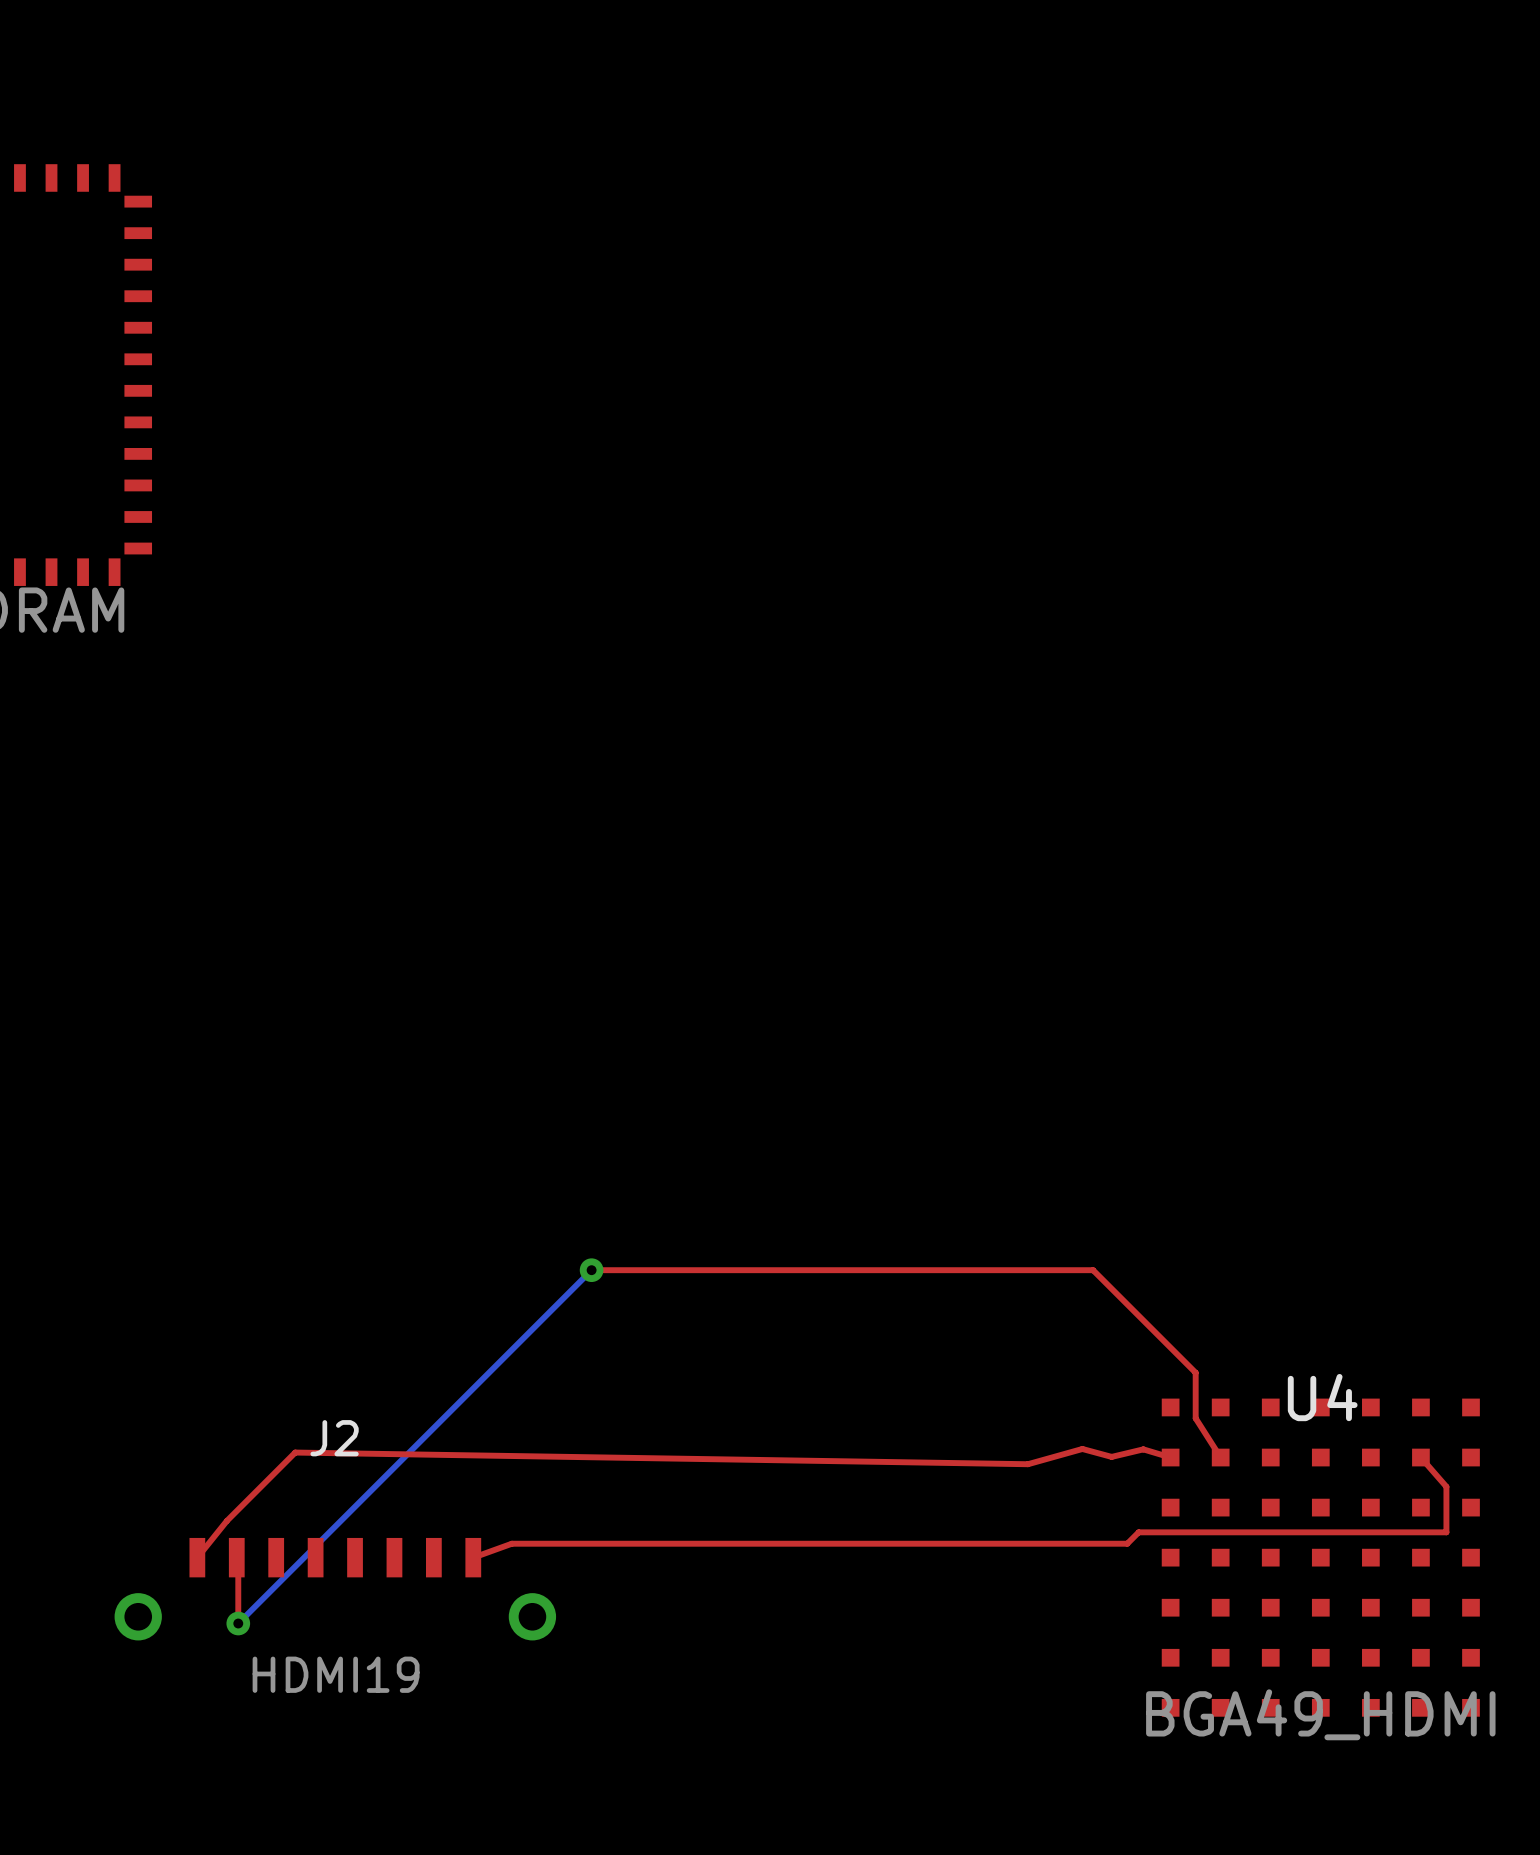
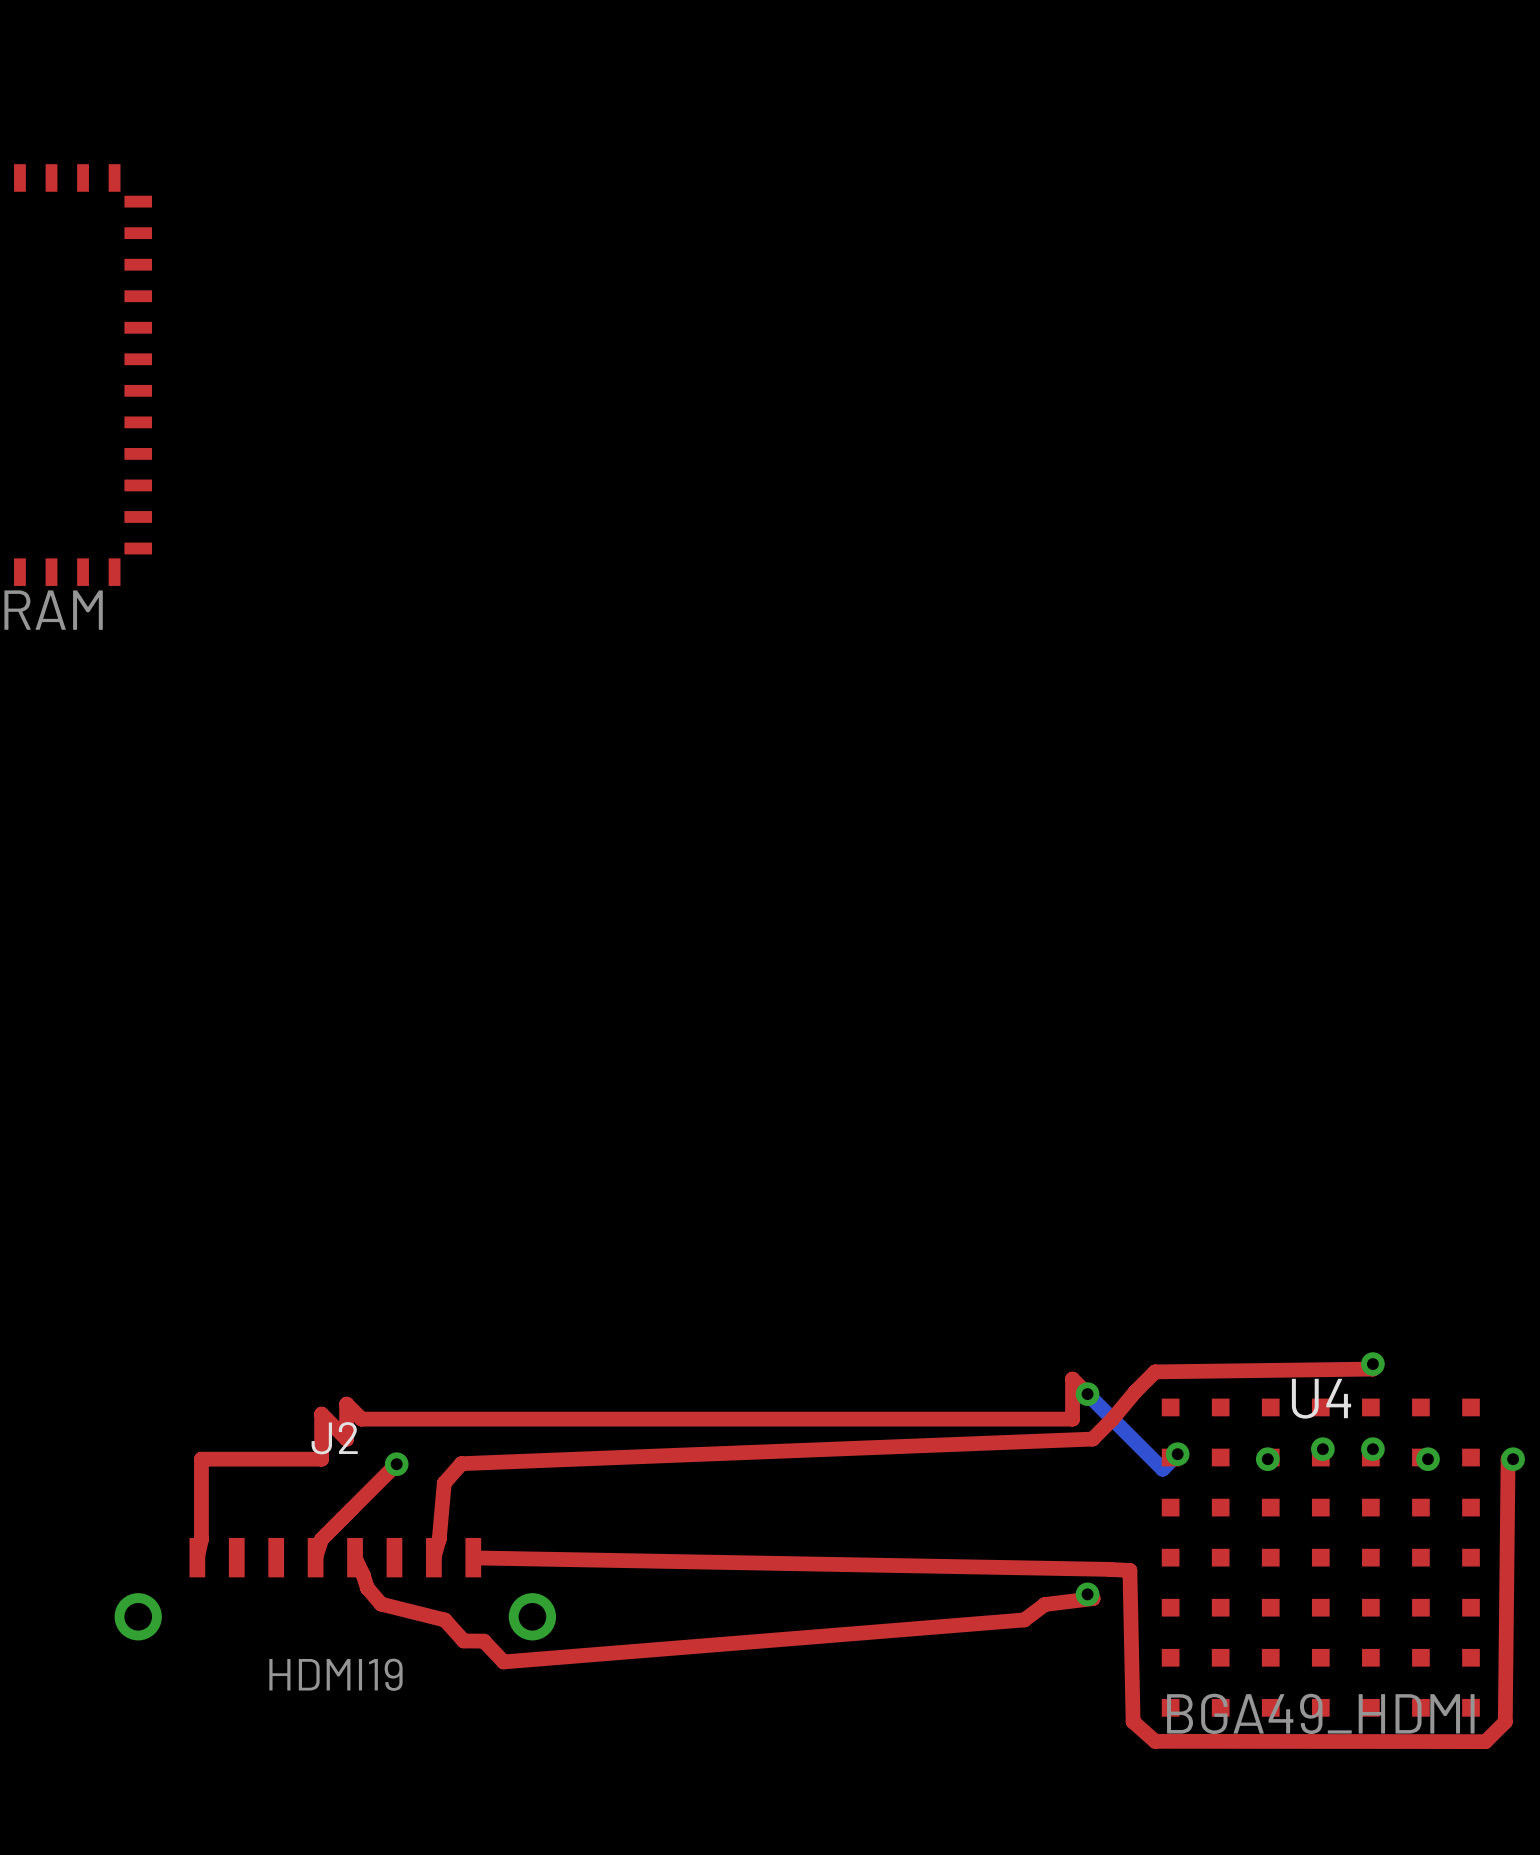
top track: (591, 1270) (1093, 1270) (1195, 1372) (1195, 1418) (1220, 1457) -> none
bottom track: (591, 1270) (238, 1623) -> none
via: (591, 1270) -> none
top track: none -> (1372, 1364) (1372, 1369) (1155, 1371) (1092, 1439) (461, 1463) (444, 1483) (439, 1539) (433, 1557)
via: none -> (1372, 1364)
bottom track: none -> (1087, 1394) (1162, 1469) (1177, 1454)
via: none -> (1087, 1394)
via: none -> (1322, 1449)
via: none -> (1372, 1449)
via: none -> (1177, 1454)
top track: (1170, 1457) (1143, 1449) (1111, 1456) (1082, 1448) (1027, 1464) (295, 1452) (226, 1520) (197, 1557) -> (1087, 1394) (1072, 1379) (1072, 1419) (361, 1419) (346, 1404) (346, 1439) (321, 1414) (321, 1459) (201, 1459) (201, 1539) (197, 1557)
top track: (1420, 1457) (1446, 1486) (1446, 1532) (1138, 1532) (1127, 1543) (511, 1543) (473, 1557) -> (1513, 1459) (1508, 1459) (1505, 1722) (1485, 1741) (1155, 1741) (1133, 1721) (1129, 1570) (473, 1557)
via: none -> (1267, 1459)
via: none -> (1427, 1459)
via: none -> (1513, 1459)
top track: none -> (396, 1464) (321, 1539) (315, 1557)
via: none -> (396, 1464)
top track: (236, 1557) (238, 1623) -> none
top track: none -> (355, 1557) (367, 1588) (381, 1604) (444, 1620) (463, 1640) (483, 1641) (503, 1661) (1024, 1619) (1044, 1604) (1093, 1598) (1087, 1594)
via: none -> (1087, 1594)
via: (238, 1623) -> none

